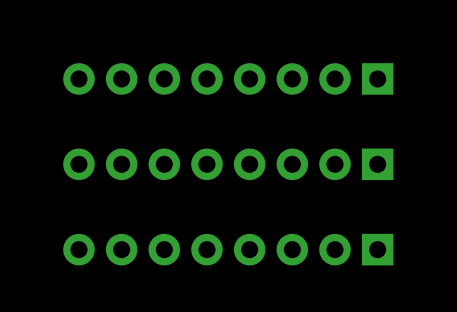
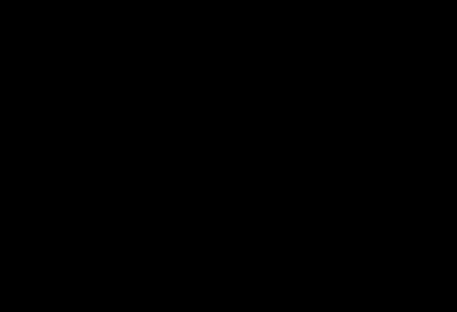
part: (228, 78) -> none
part: (228, 164) -> none
part: (228, 249) -> none

